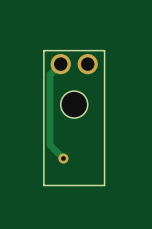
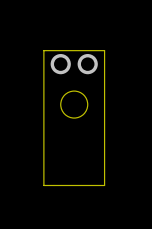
track: (60, 64) (49, 74) (49, 145) (63, 158) -> none
via: (63, 158) -> none

